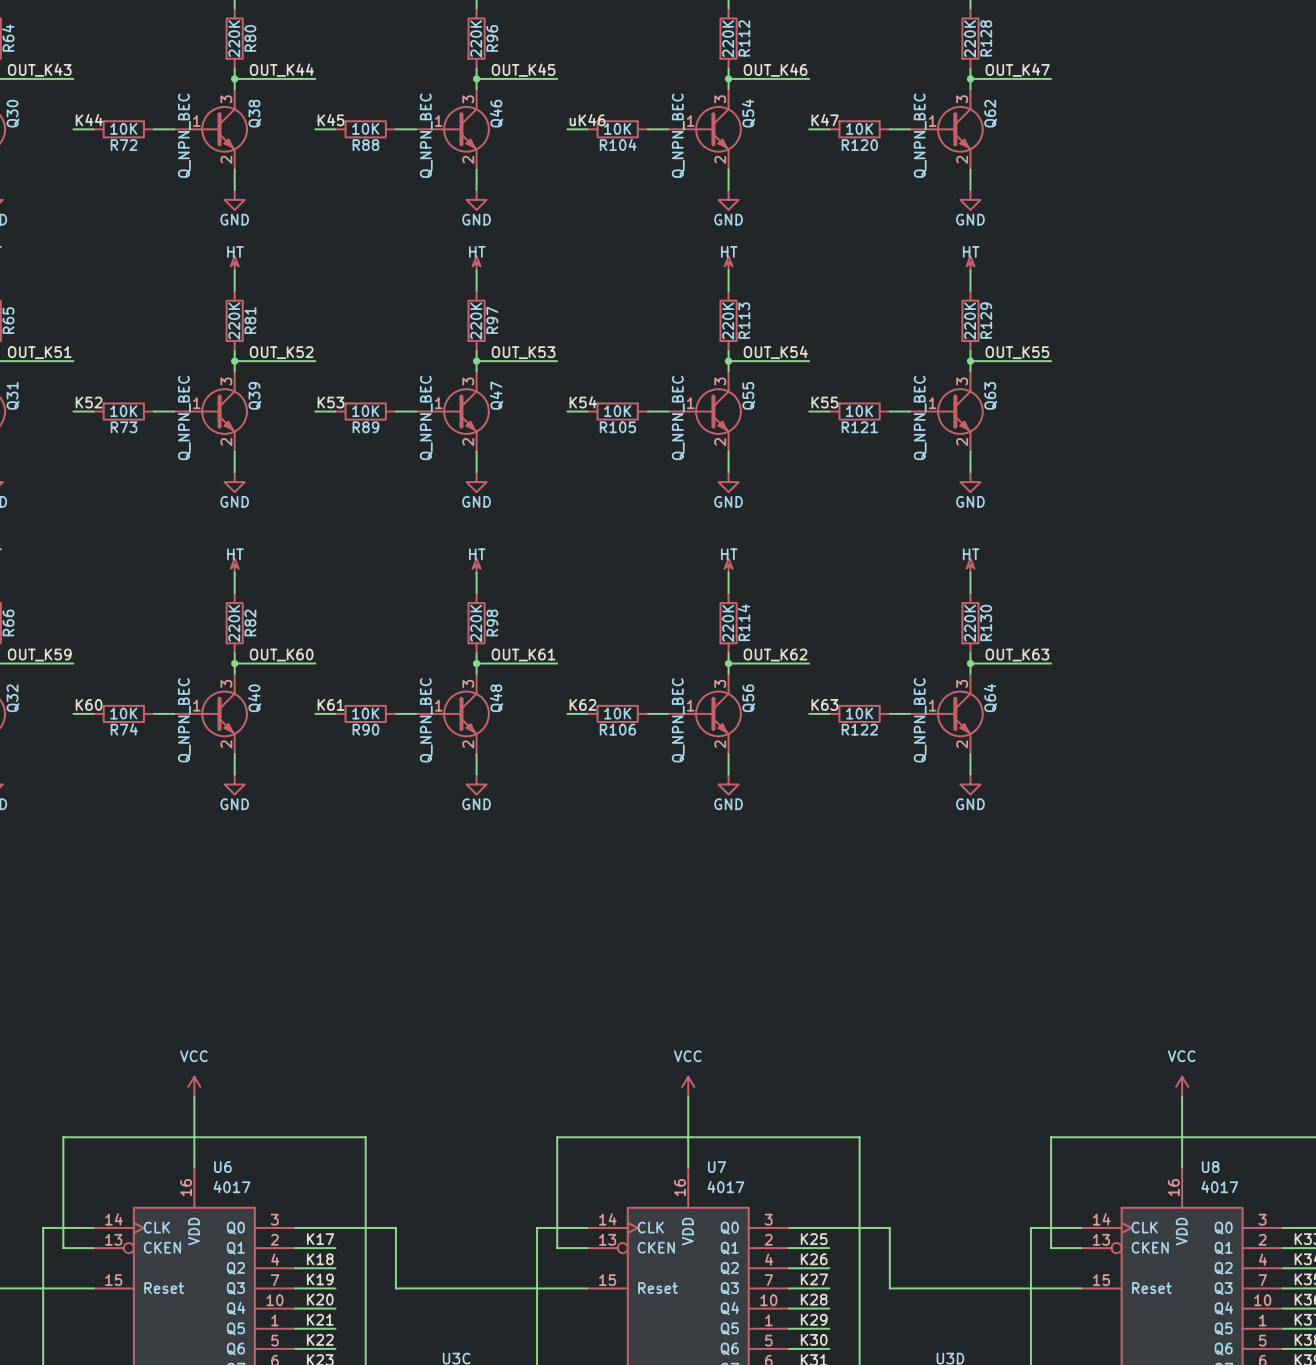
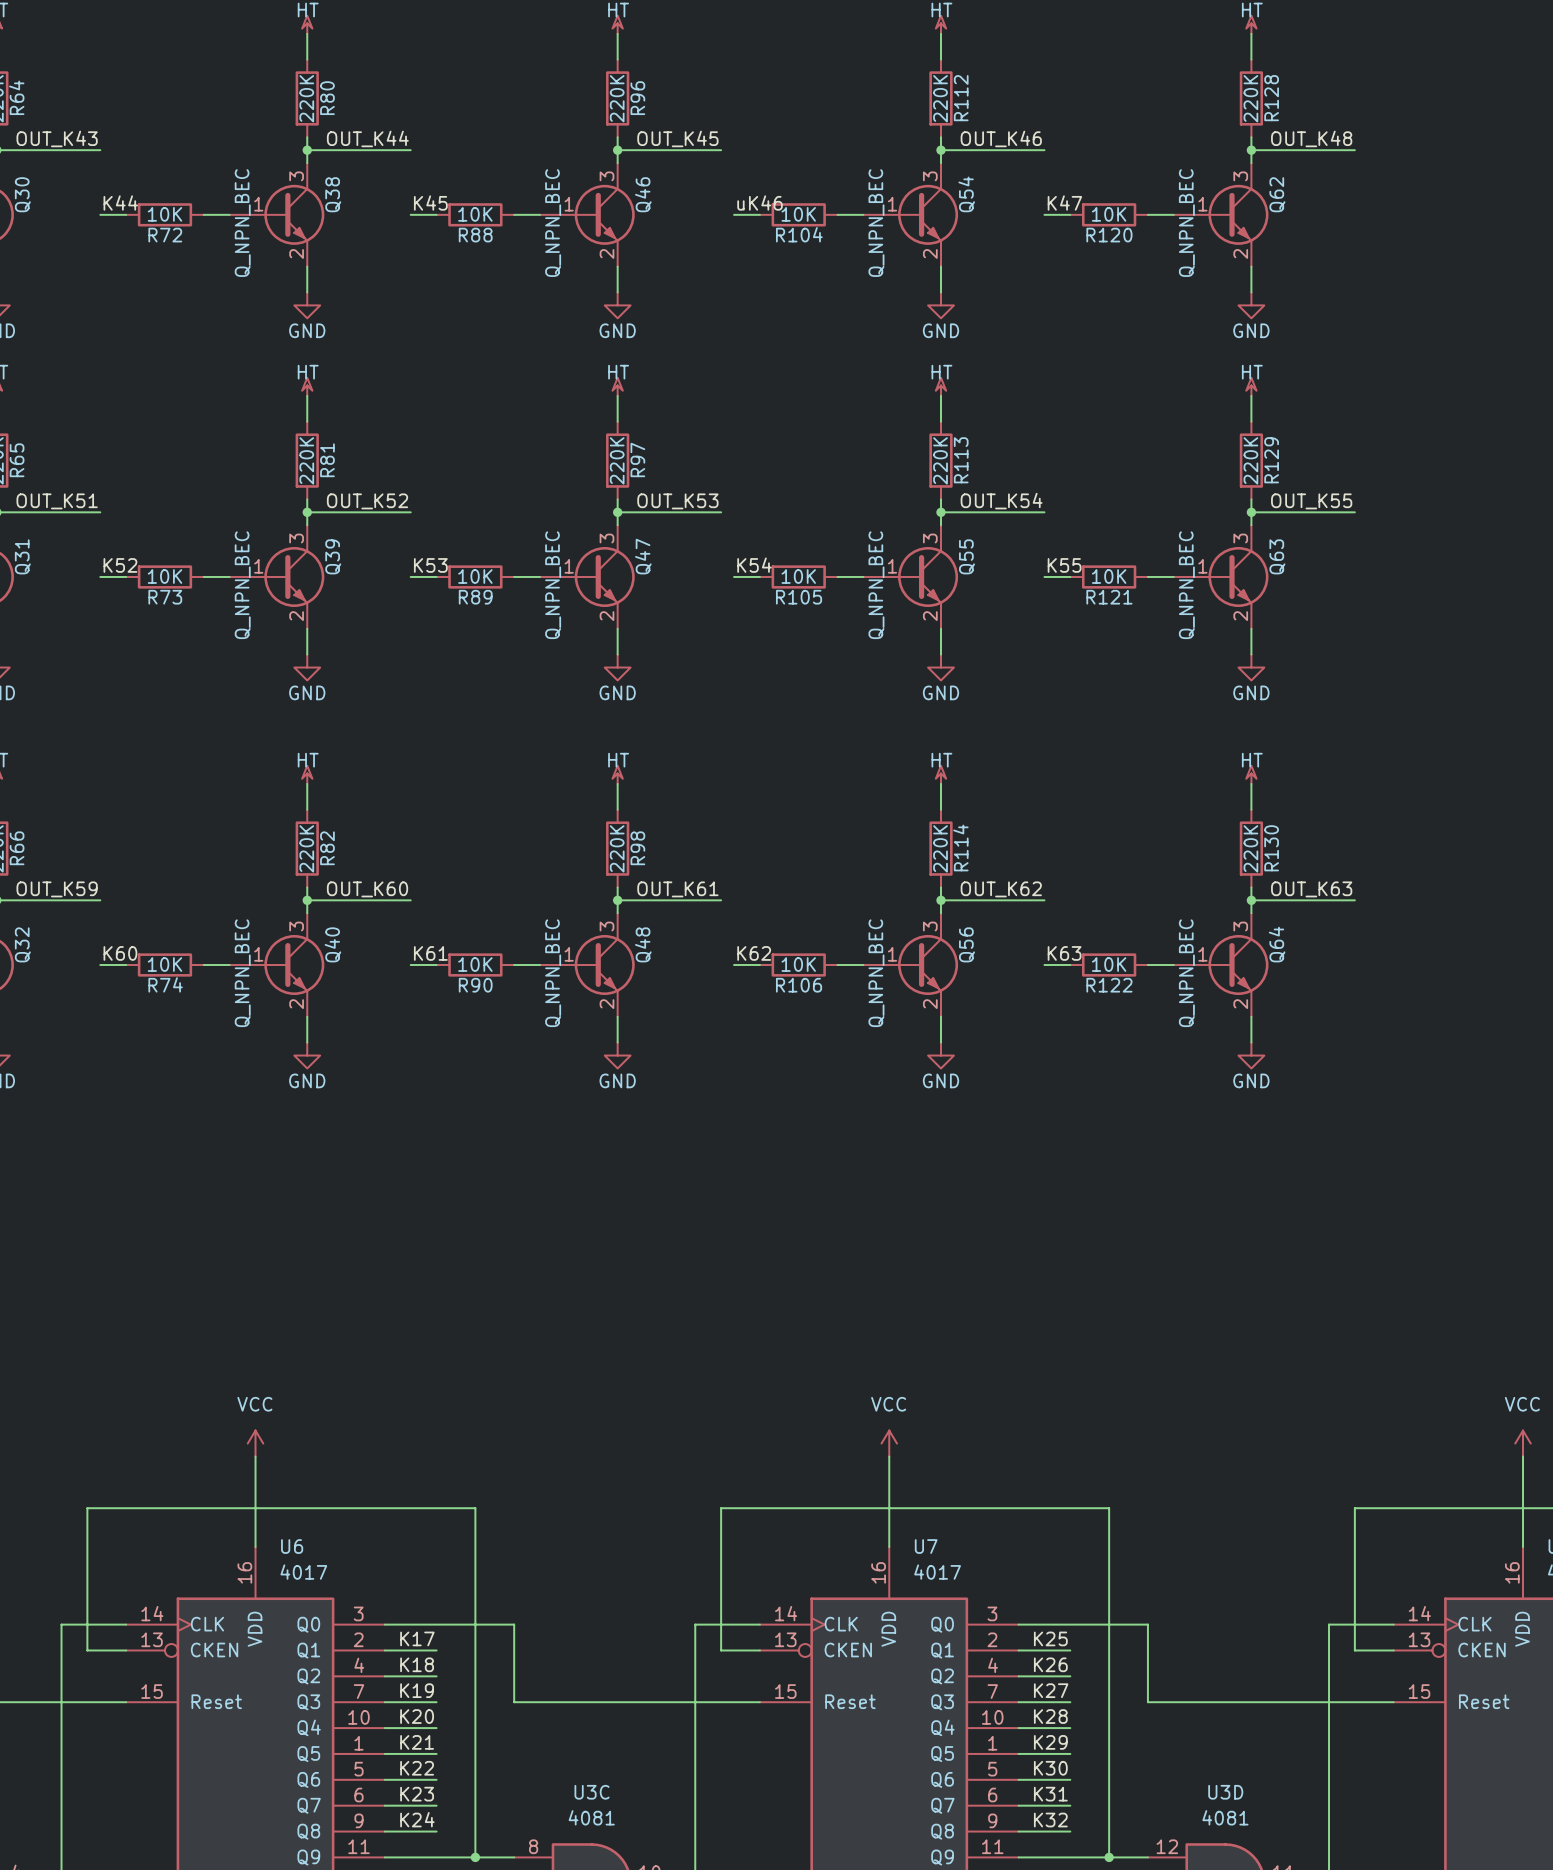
label: OUT_K47 (1017, 70) -> OUT_K48 (1311, 138)

